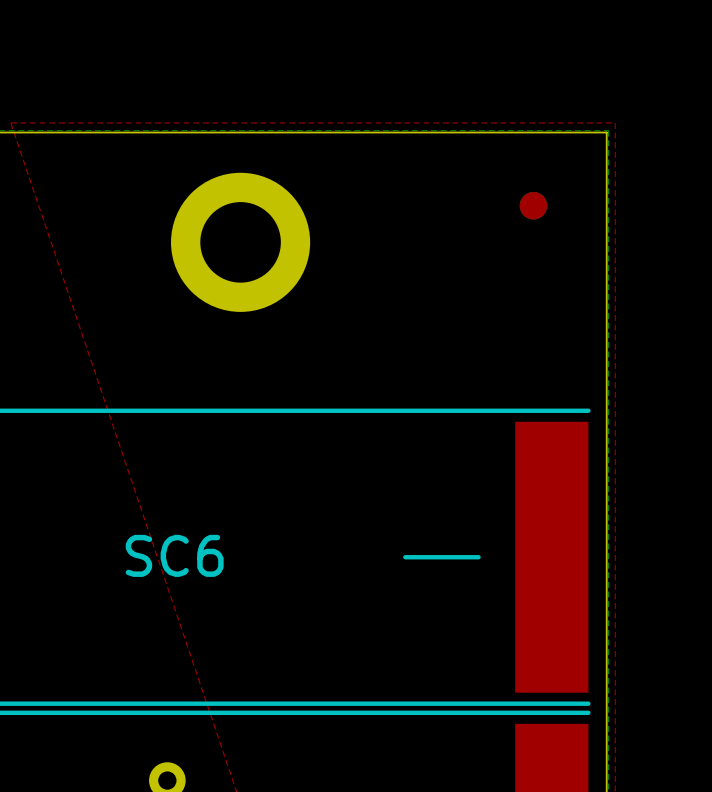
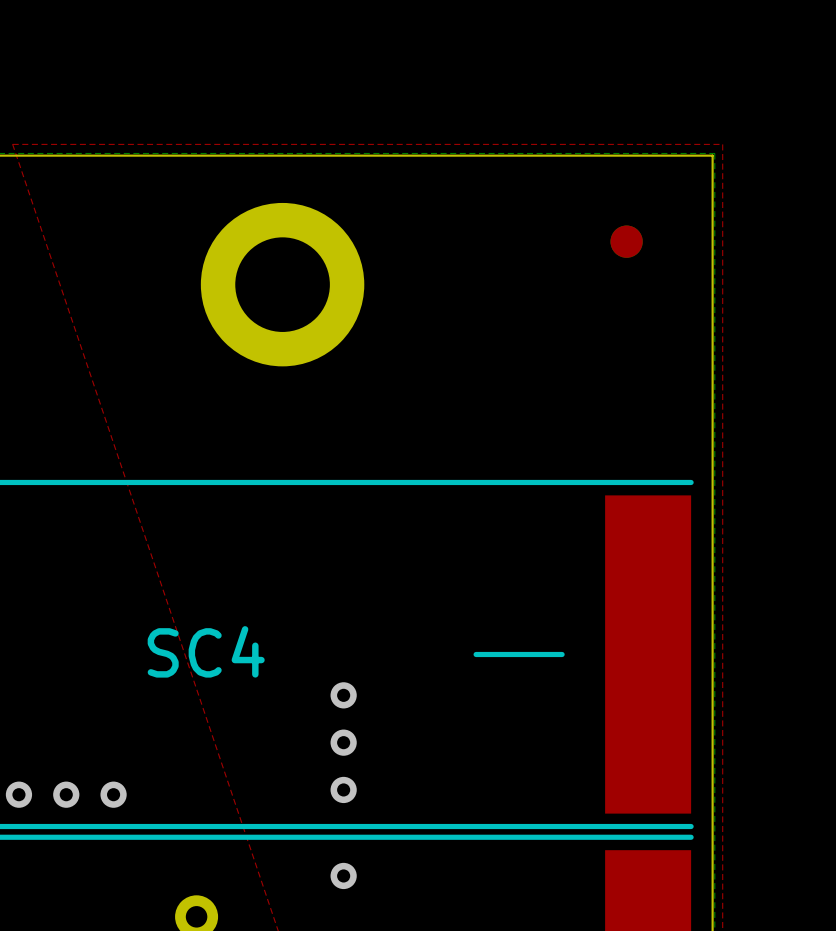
SC6 name: SC6 (174, 555) -> SC4 (206, 651)
via: none -> (343, 695)
via: none -> (343, 742)
via: none -> (343, 789)
via: none -> (18, 794)
via: none -> (66, 794)
via: none -> (113, 794)
via: none -> (343, 875)

